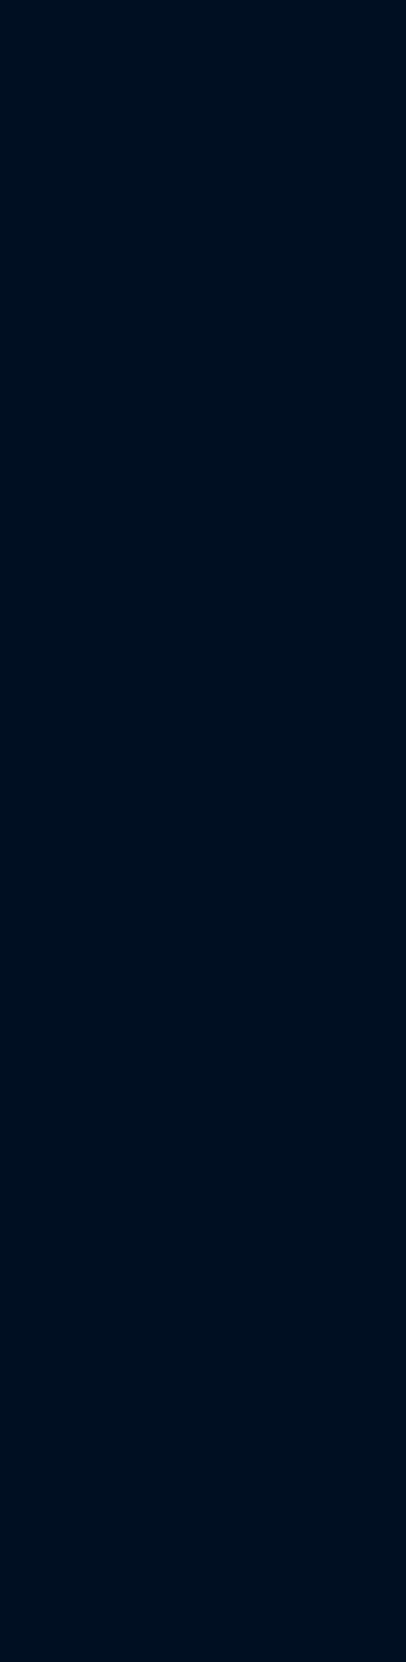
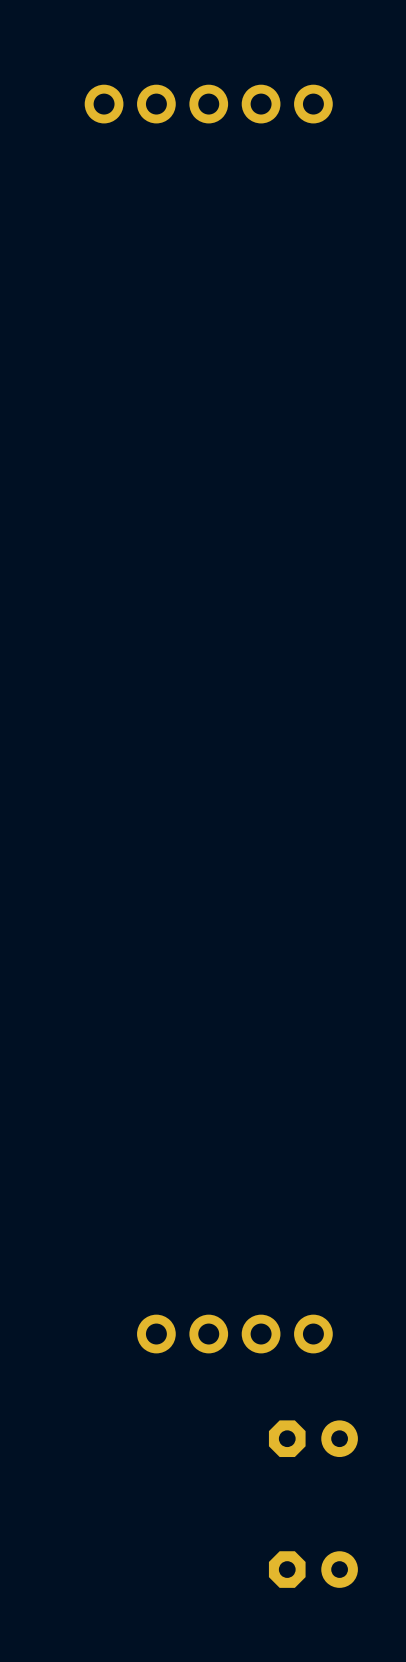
part: none -> (208, 104)
part: none -> (234, 1334)
part: none -> (313, 1438)
part: none -> (313, 1569)

